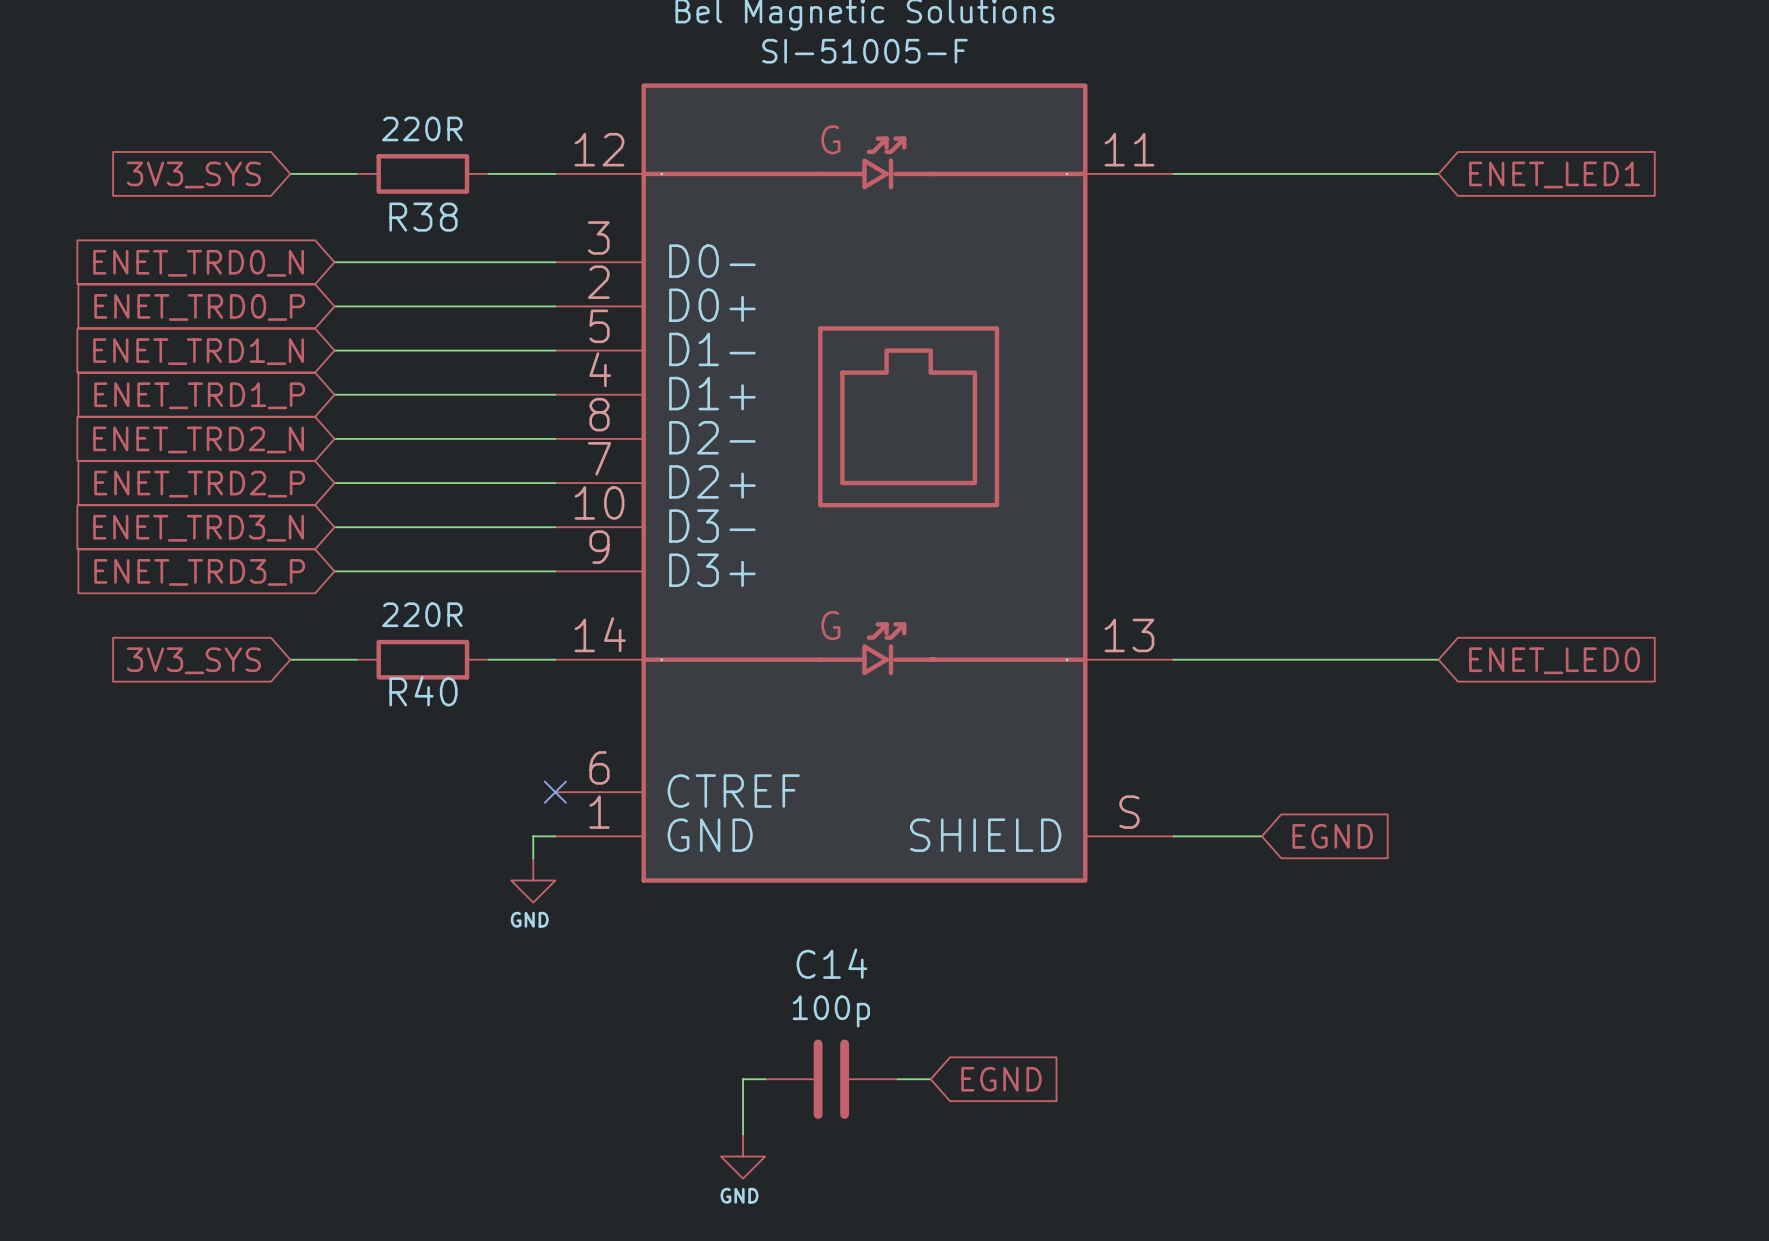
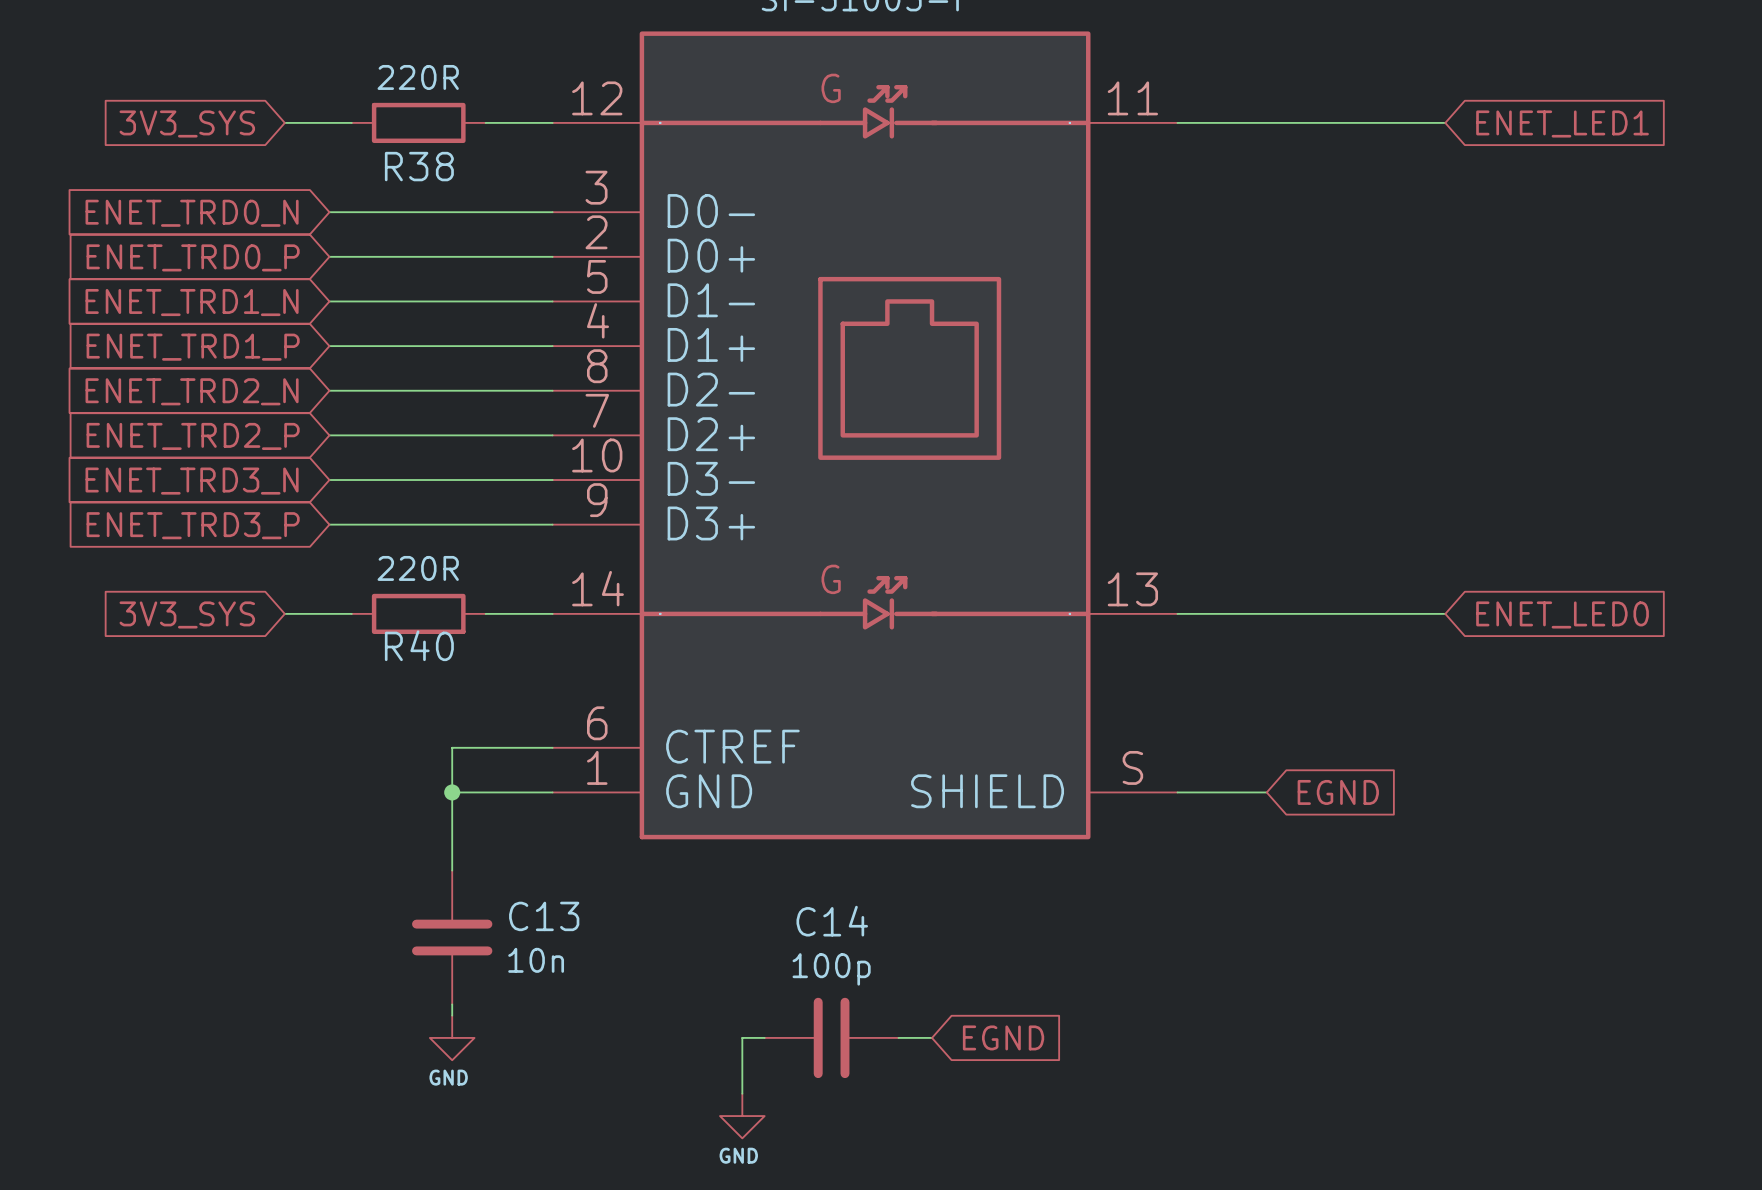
wire: none -> (552, 747) (452, 747) (452, 870)
no-connect mark: (555, 792) -> none
junction: none -> (452, 792)
wire: (533, 836) (533, 858) -> (530, 792) (452, 792)
power symbol position: GND (533, 880) -> GND (452, 1037)
C13: none -> (452, 937)
wire: none -> (452, 1004) (452, 1015)

